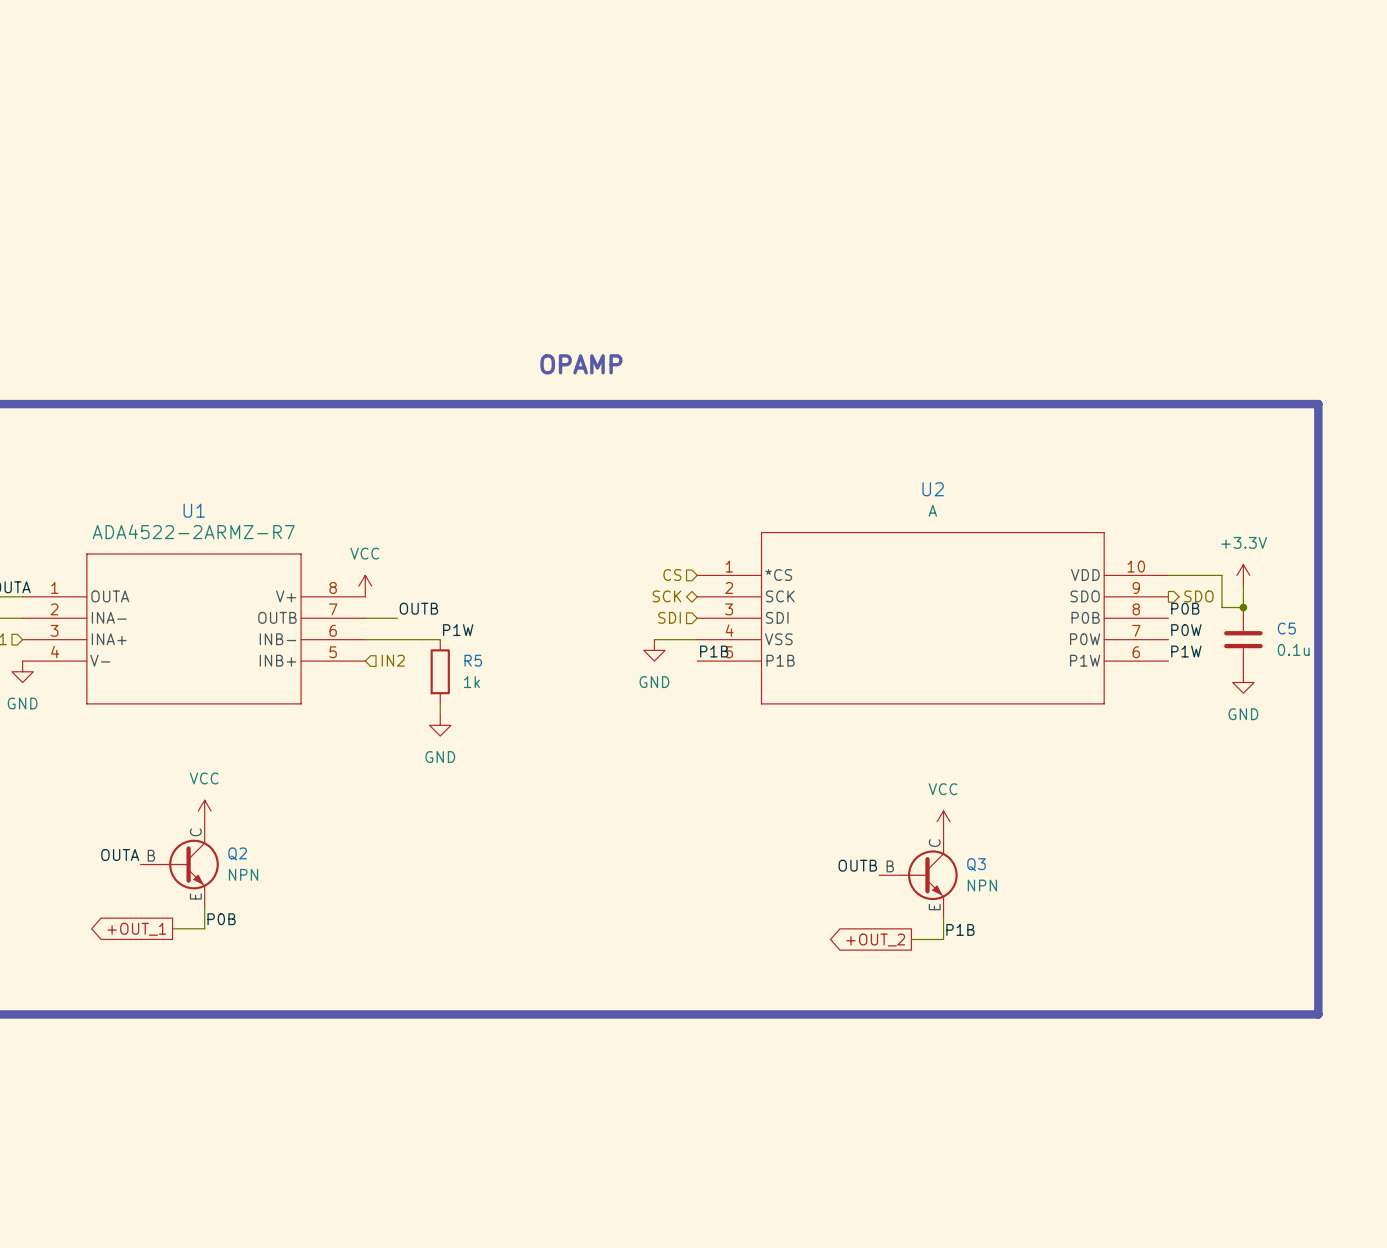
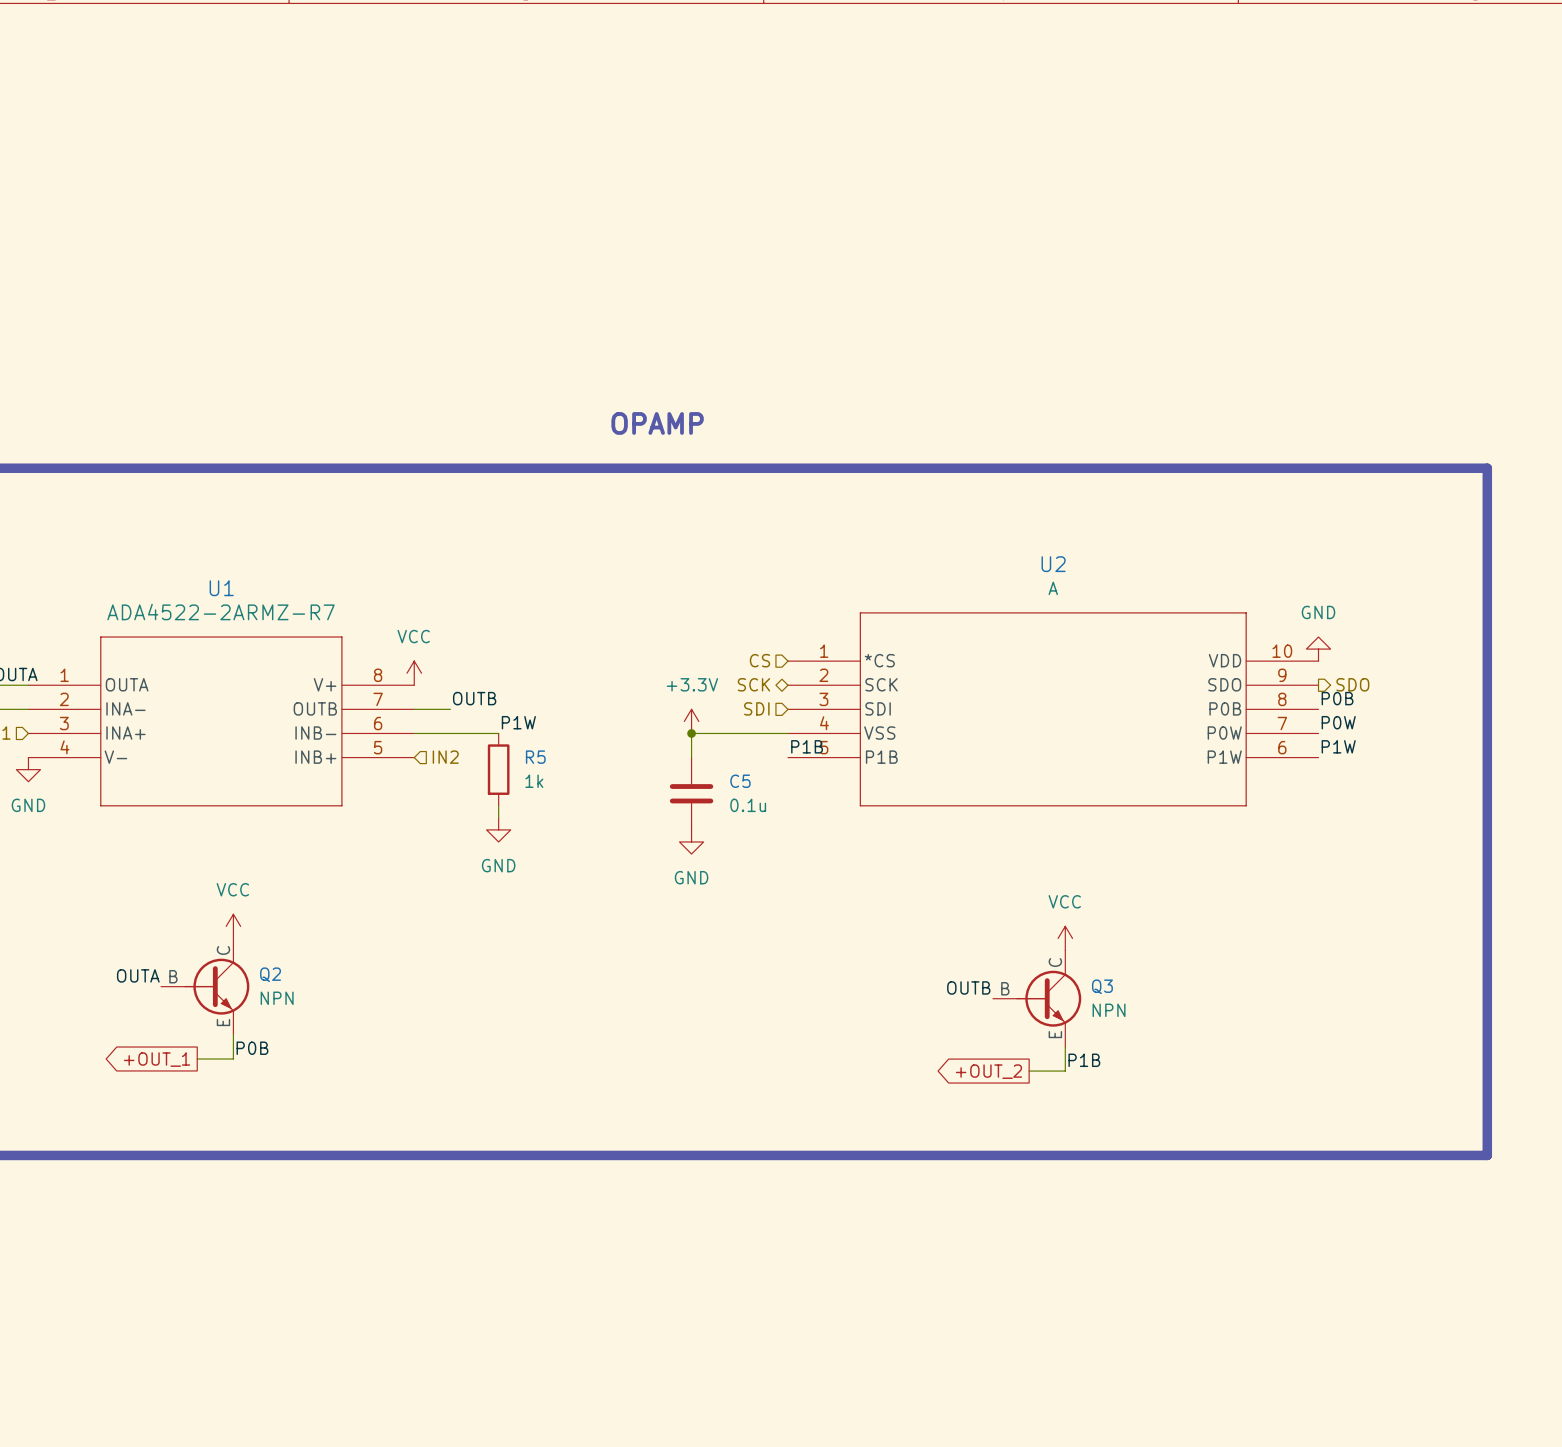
wire: (1168, 575) (1221, 575) (1221, 607) (1243, 607) (1243, 586) -> none
power symbol: +3.3V (1243, 575) -> none
junction: (1243, 607) -> none
power symbol: none -> +3.3V (691, 721)
junction: none -> (691, 733)
wire: none -> (739, 733) (691, 733) (691, 757)
C5 position: (1243, 639) -> (691, 793)
power symbol position: GND (654, 650) -> GND (691, 841)
power symbol rotation: 0° (1243, 682) -> 180° (1318, 649)
power symbol position: GND (1243, 682) -> GND (1318, 649)

